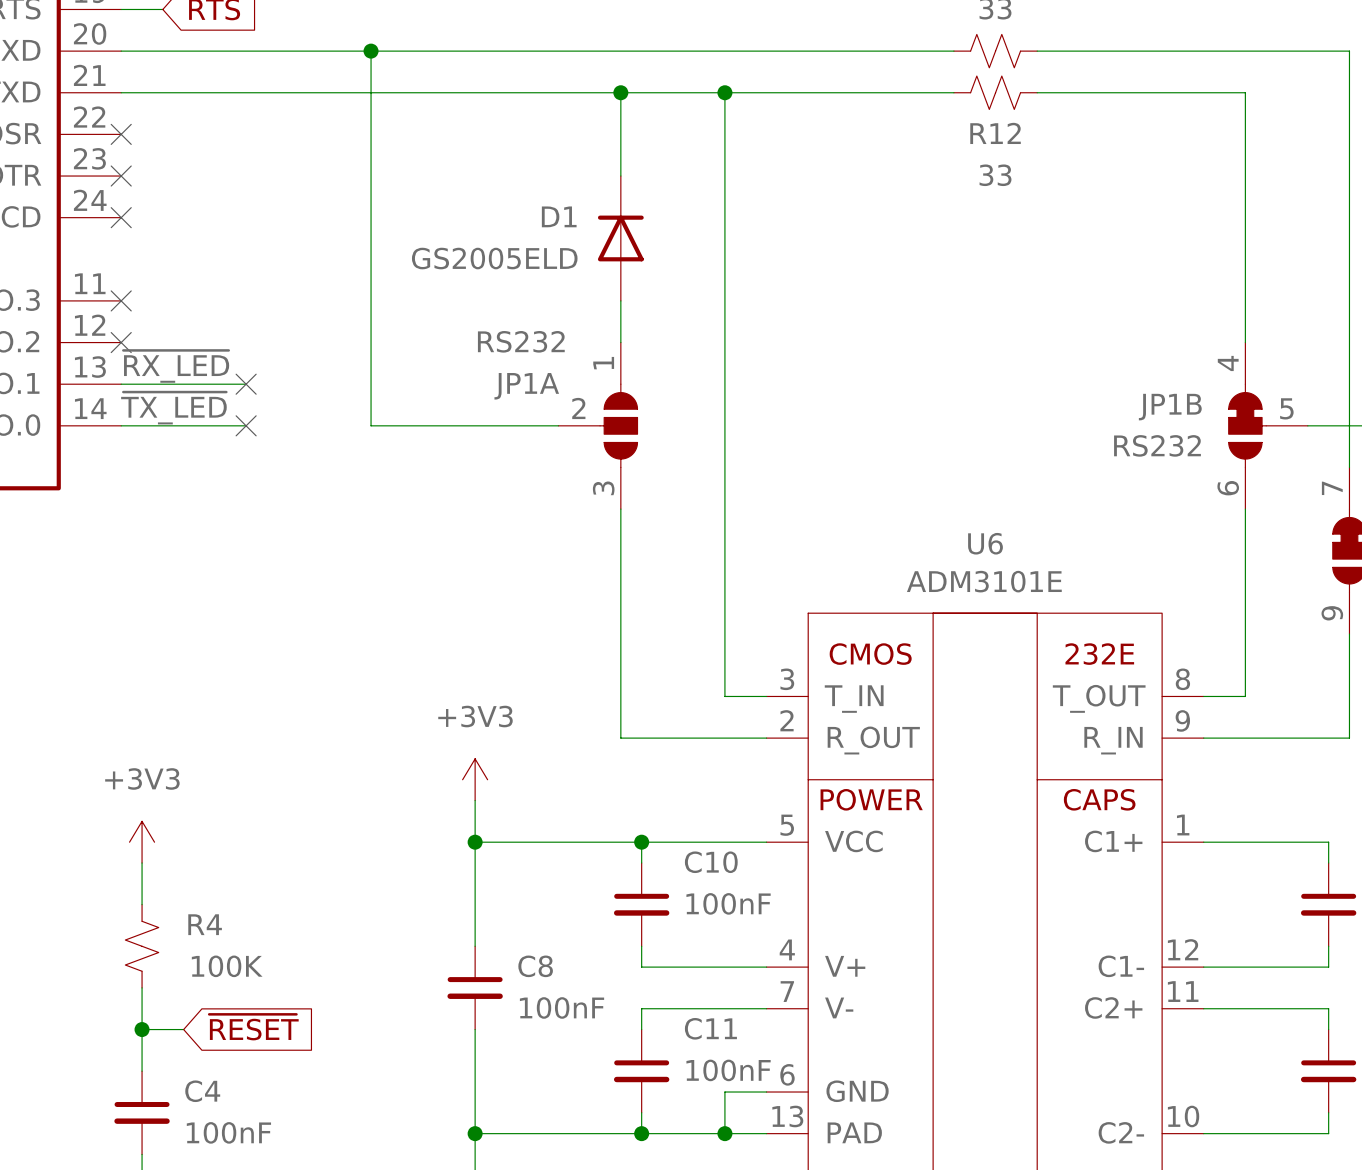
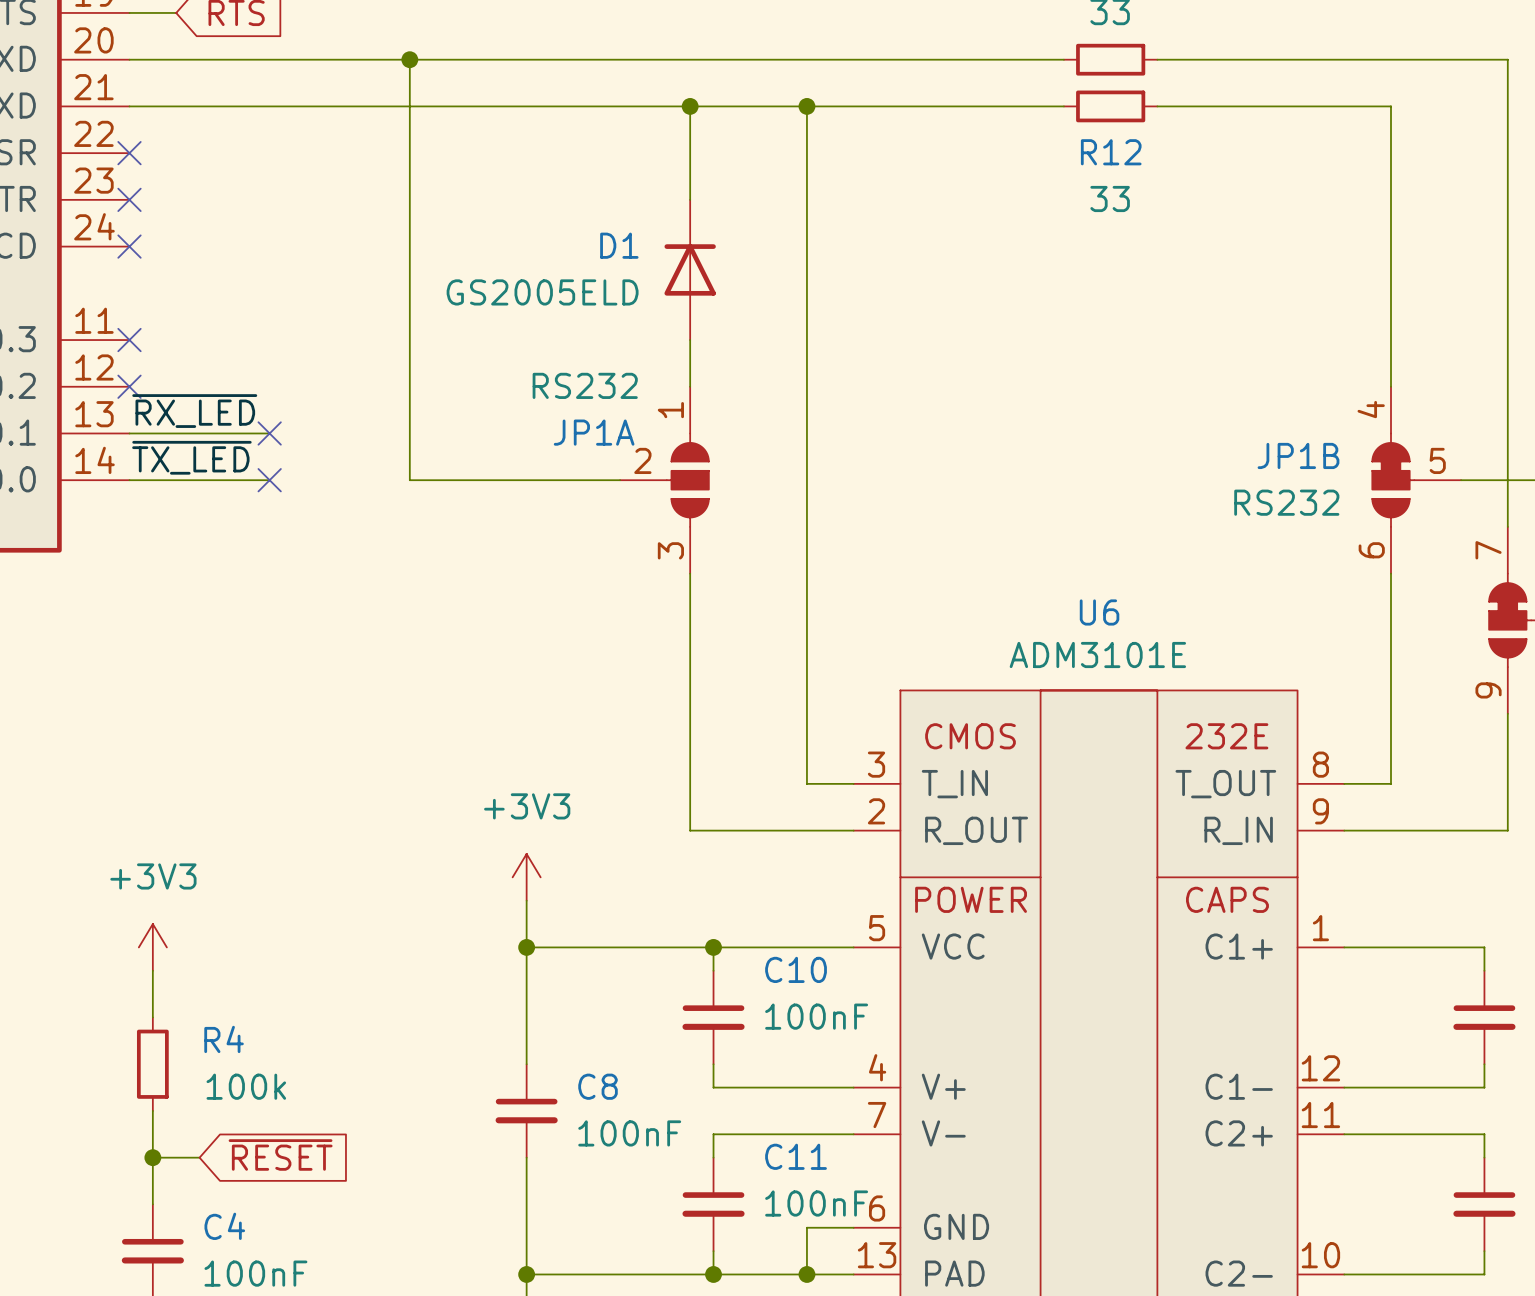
part symbol: [953, 34, 1038, 68] -> [1063, 43, 1158, 76]
R12 symbol: [953, 76, 1038, 110] -> [1063, 90, 1158, 123]
R4 symbol: [125, 904, 159, 988] -> [136, 1017, 169, 1111]
R4 value: 100K (227, 966) -> 100k (246, 1086)

